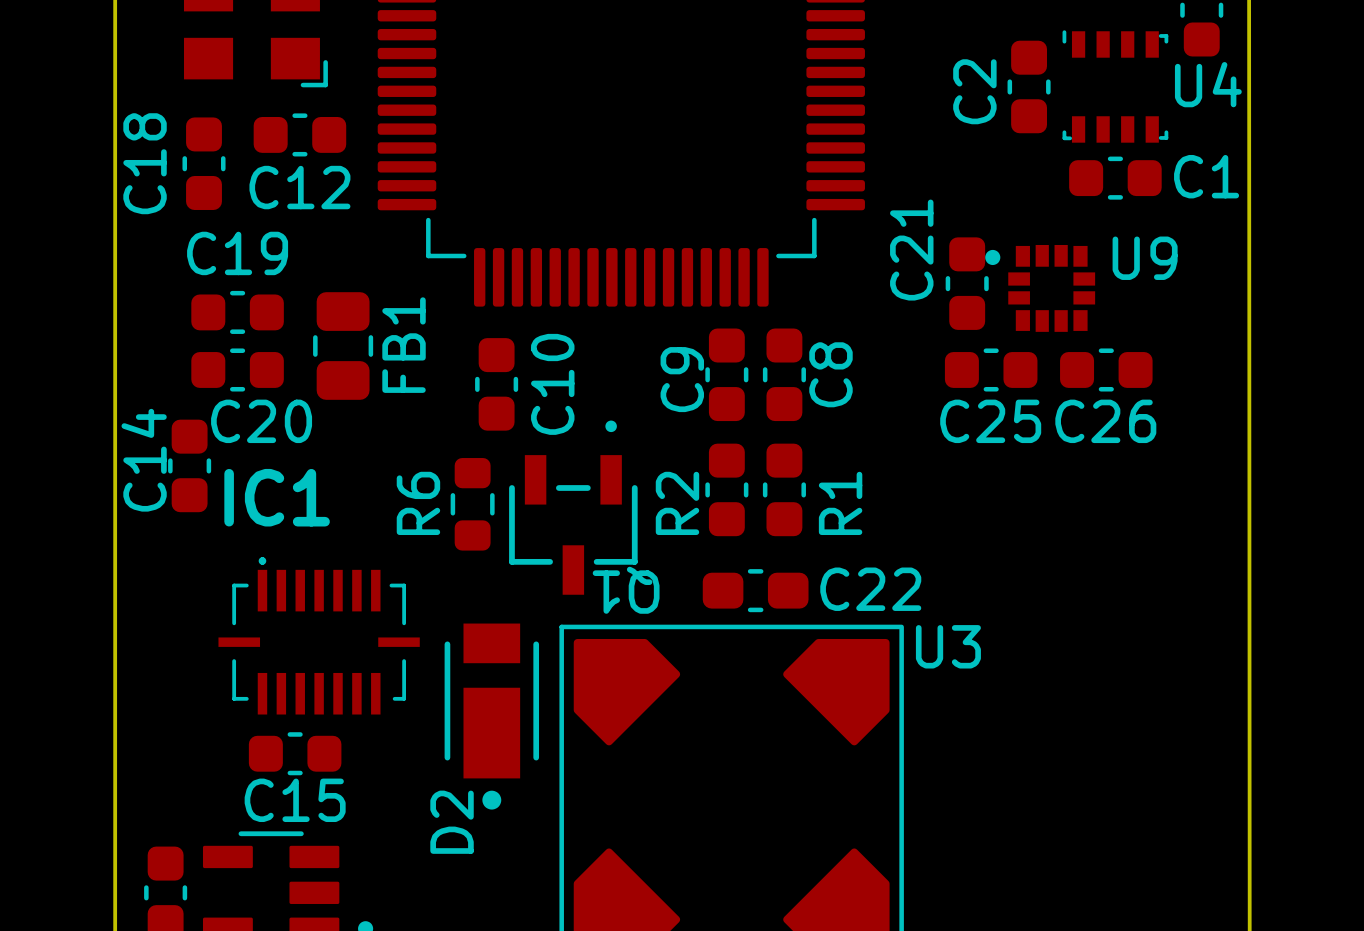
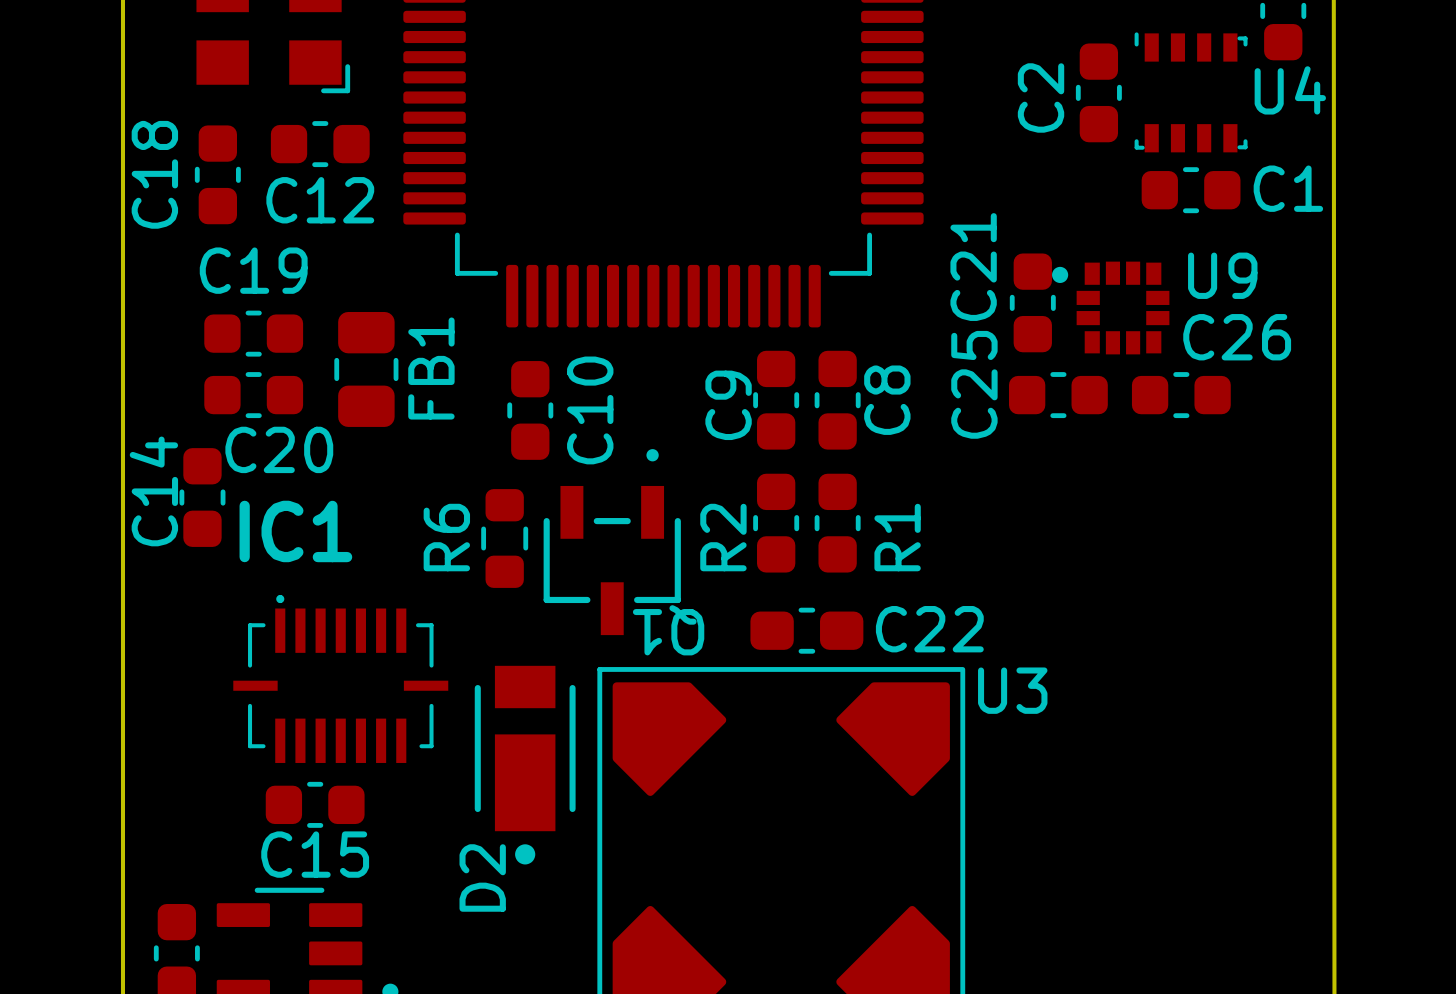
C25 name rotation: 0° (990, 421) -> 90° counterclockwise (974, 384)
C26 name position: C26 (1105, 421) -> C26 (1237, 337)

